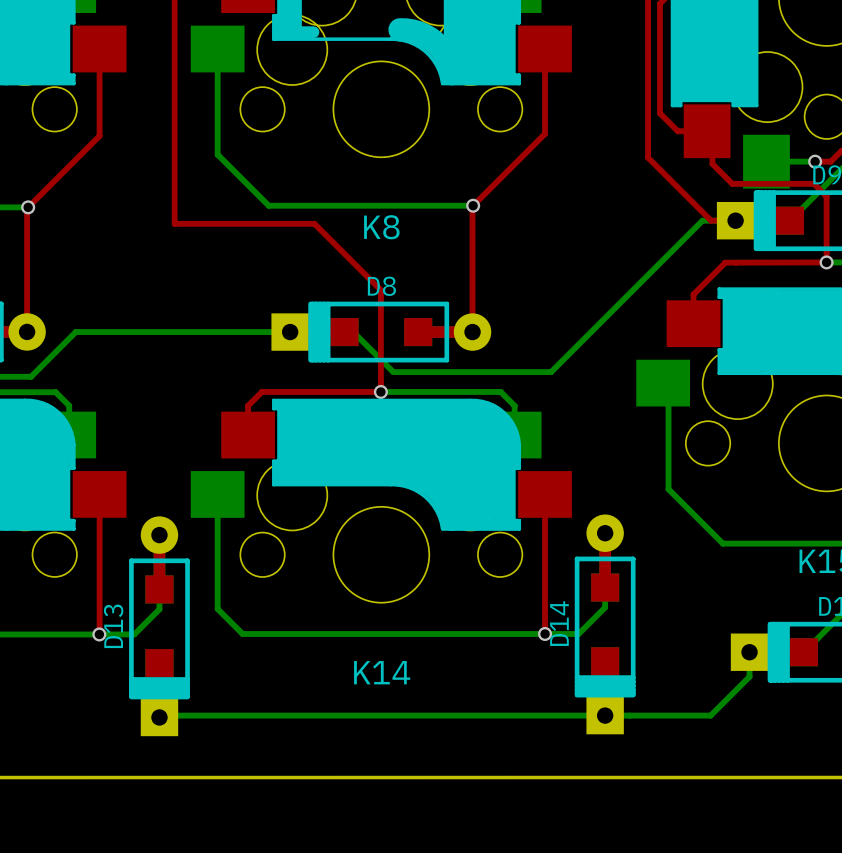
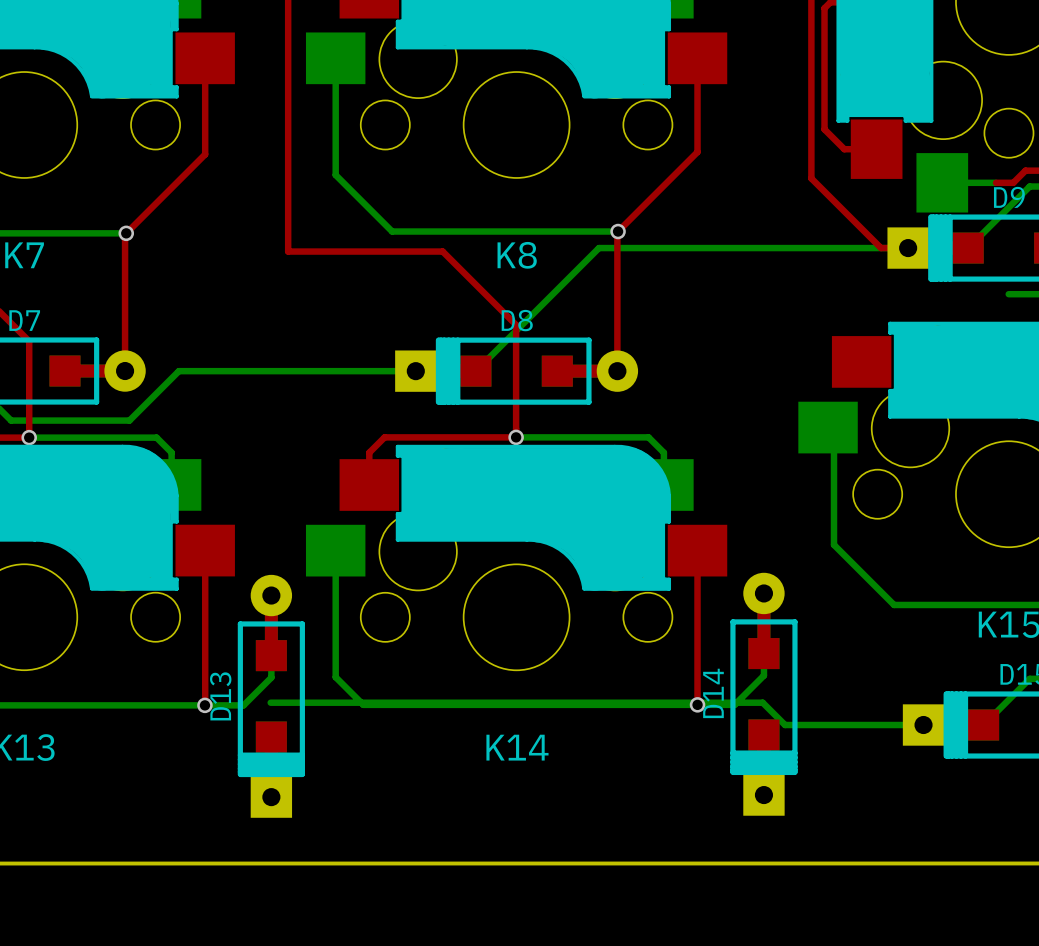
top track: (712, 131) (712, 163) (732, 183) (813, 183) (826, 196) (826, 262) (725, 262) (693, 294) (693, 323) -> none
via: (815, 161) -> none
bottom track: (702, 220) (551, 372) (393, 372) (353, 332) (318, 332) -> (871, 248) (598, 248) (475, 371)
via: (826, 262) -> none
bottom track: (749, 652) (749, 676) (710, 715) (161, 715) (159, 717) -> (923, 725) (785, 725) (762, 702) (270, 702)

